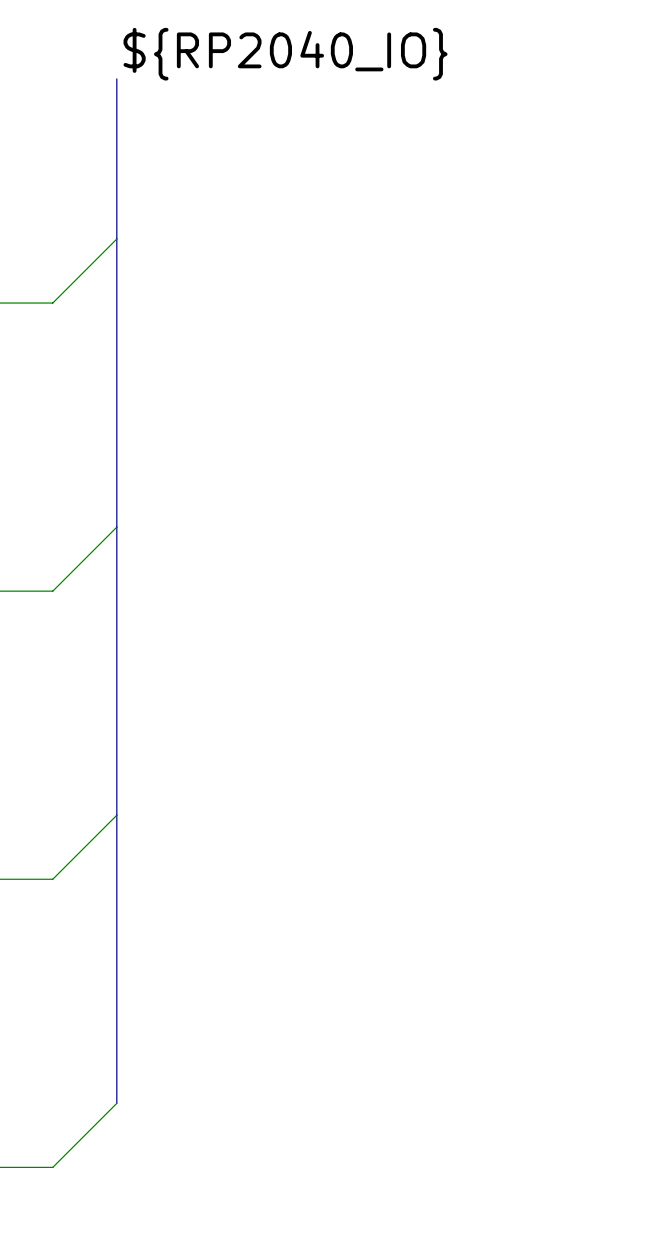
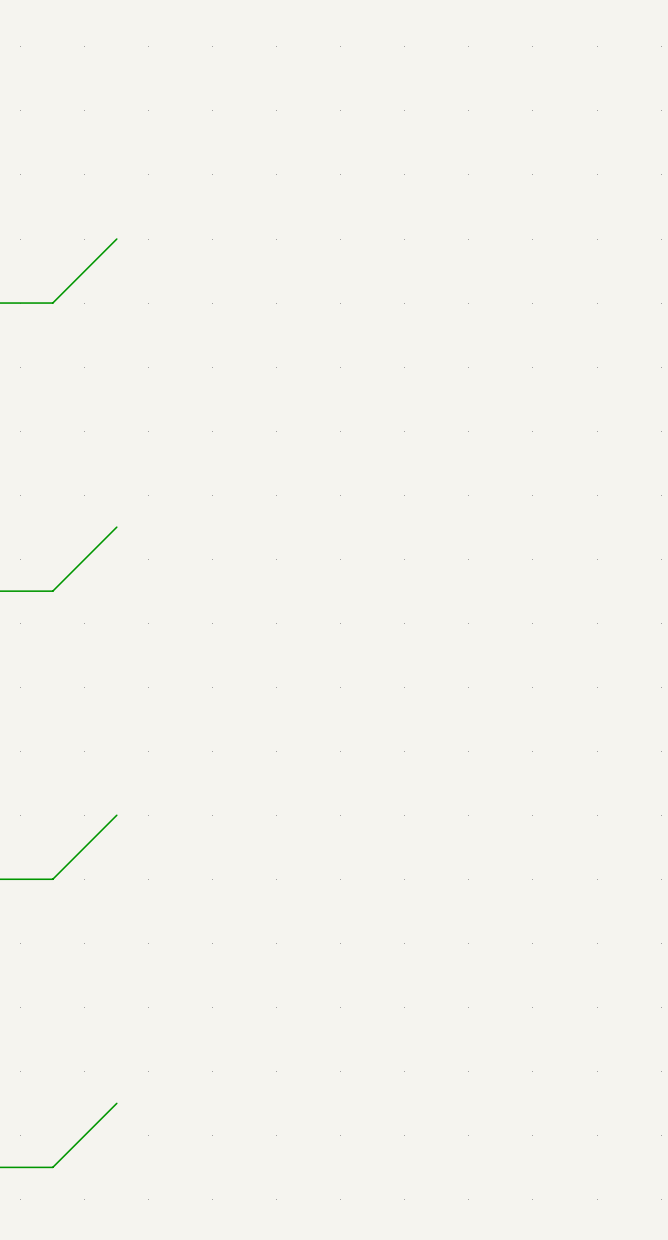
label: ${RP2040_IO} (285, 54) -> none
bus: (116, 78) (116, 1103) -> none

